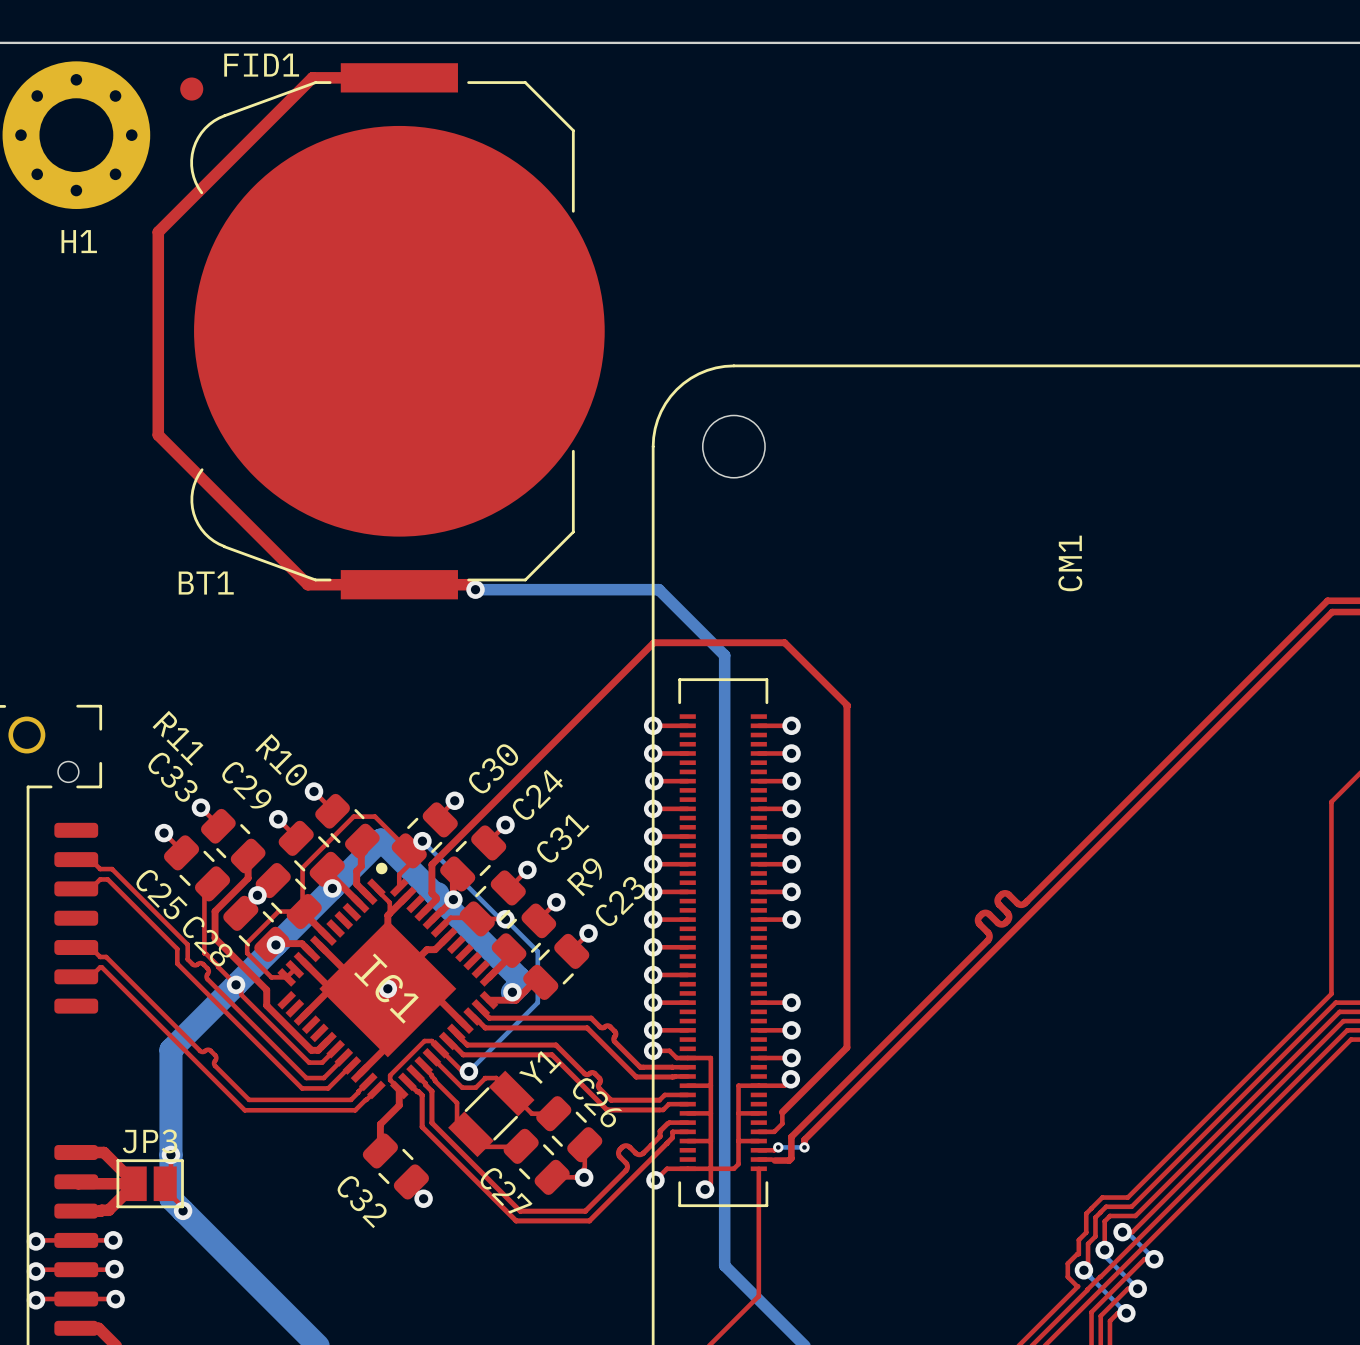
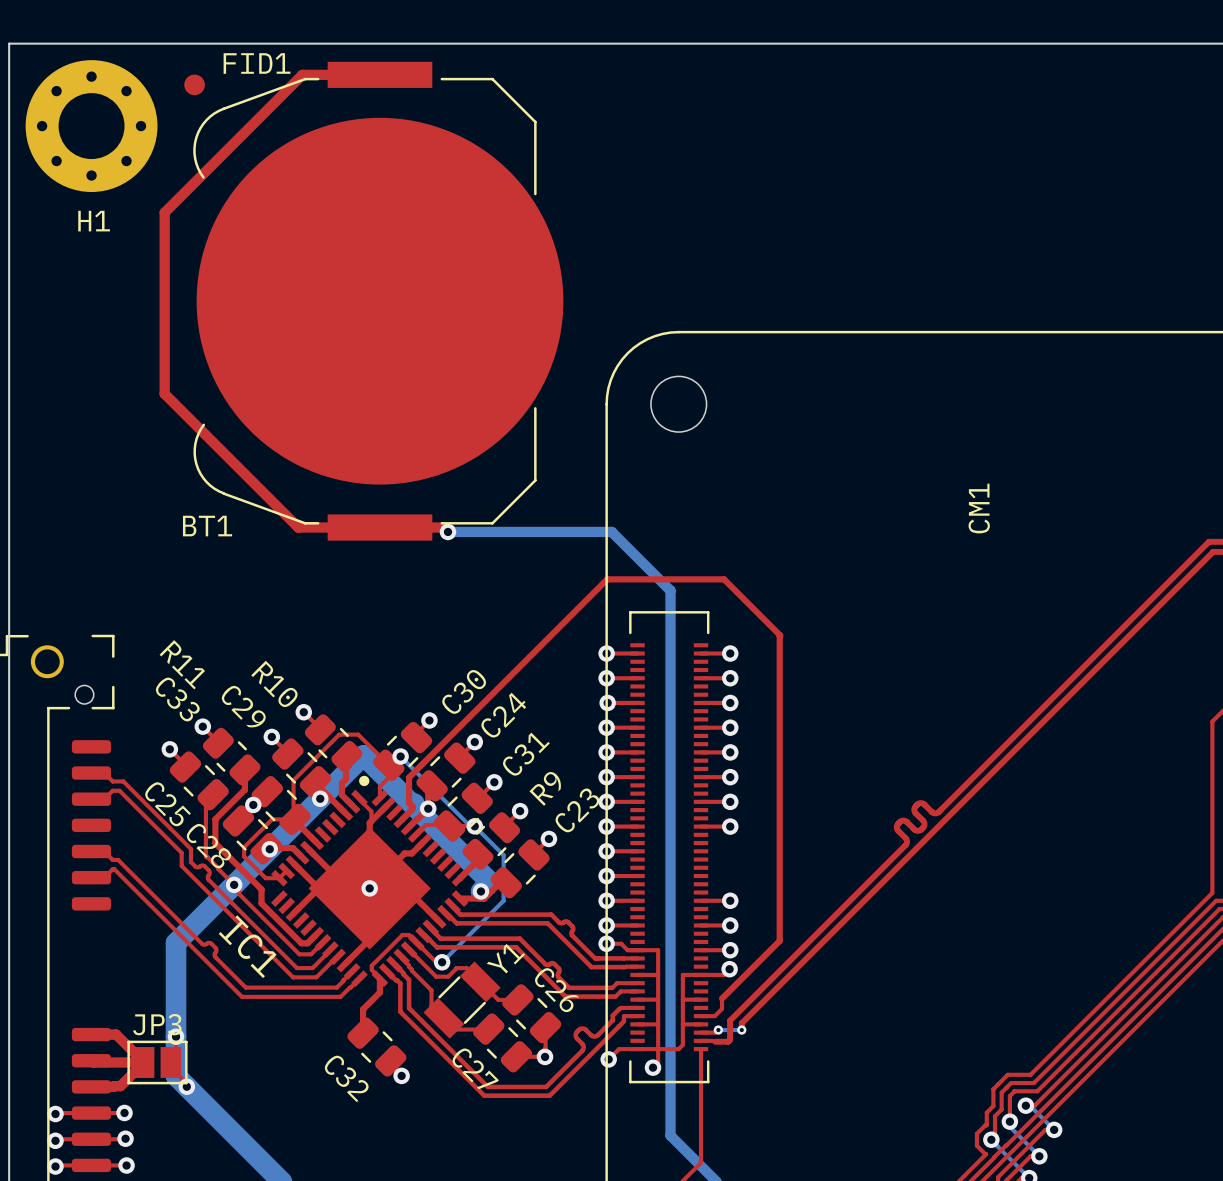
IC1 name position: IC1 (386, 988) -> IC1 (247, 946)

